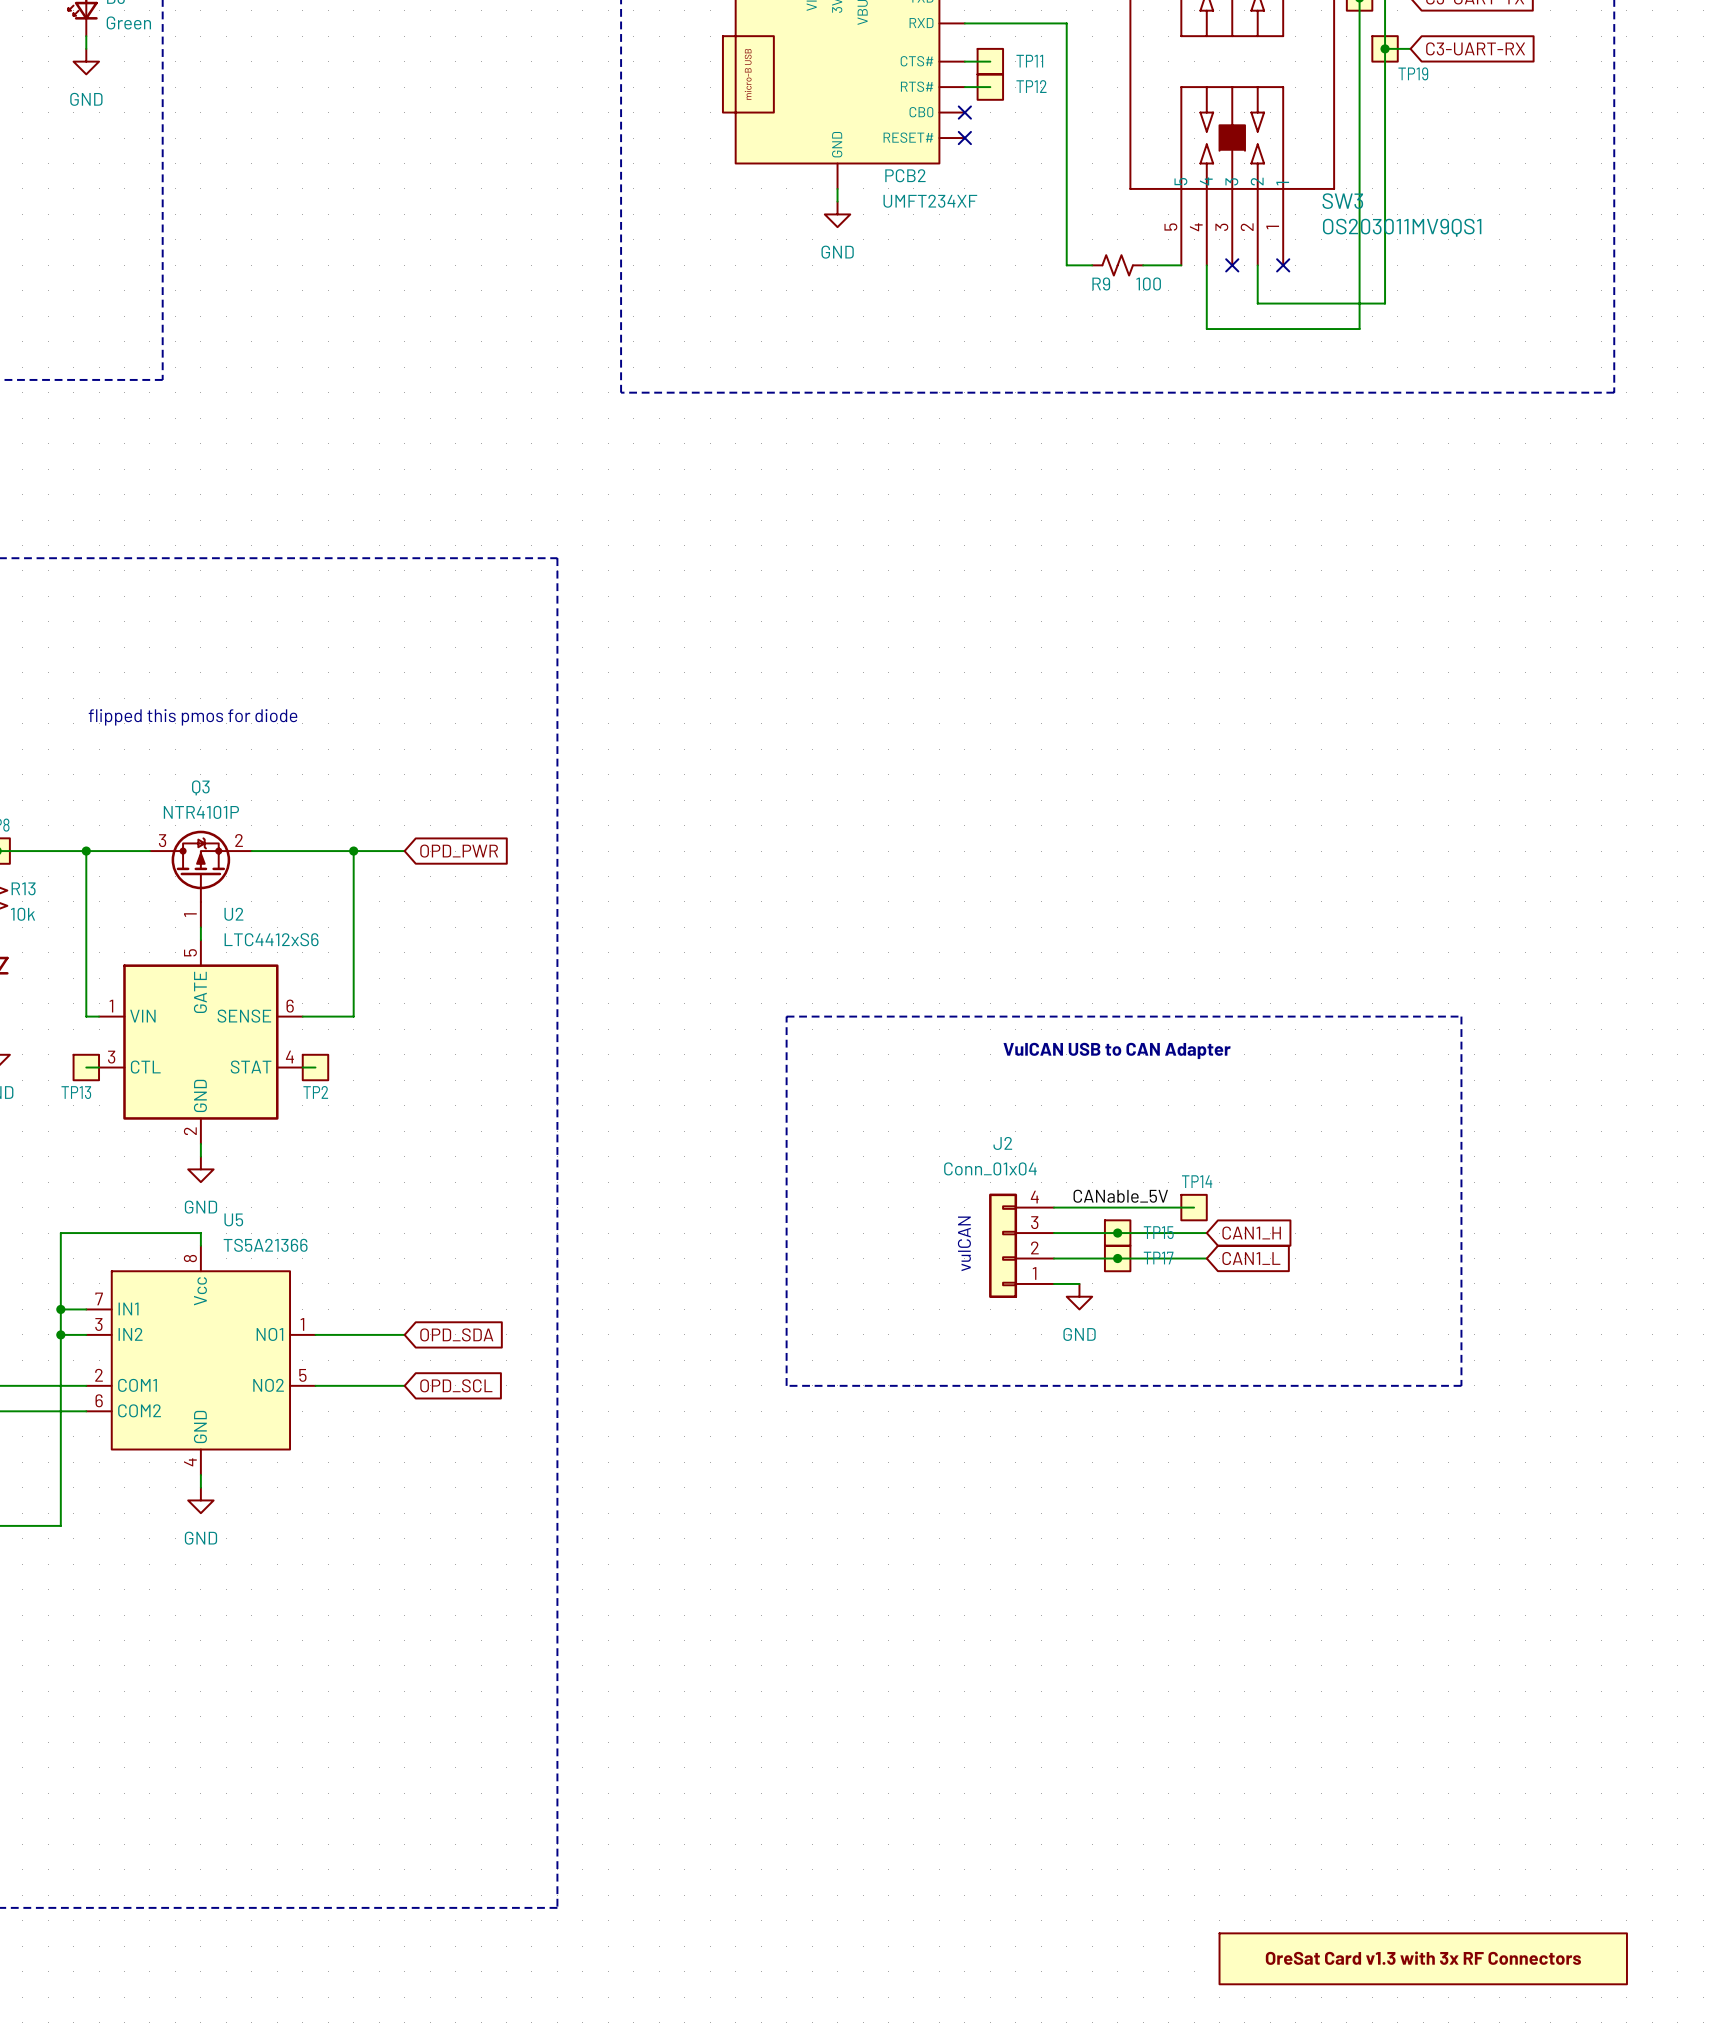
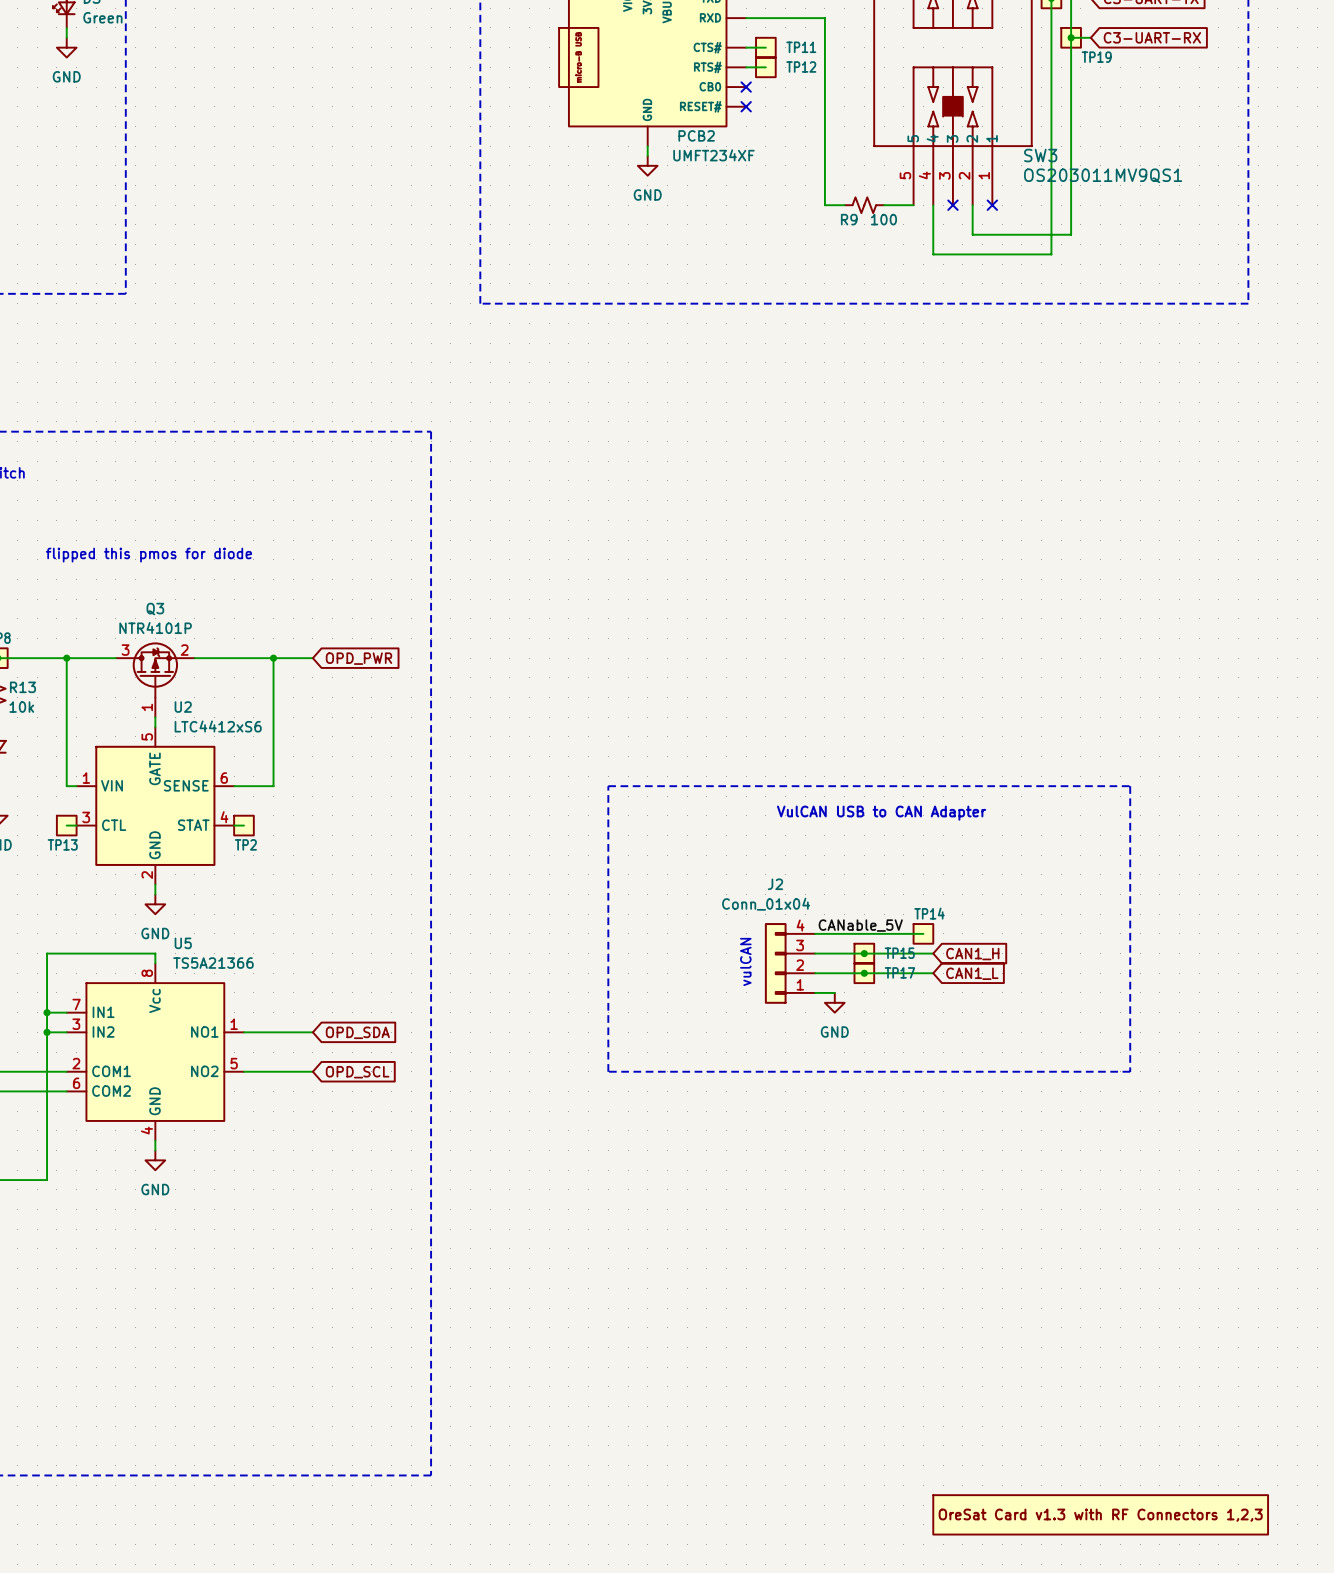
part symbol: [1219, 1933, 1627, 1985] -> [933, 1495, 1269, 1535]

